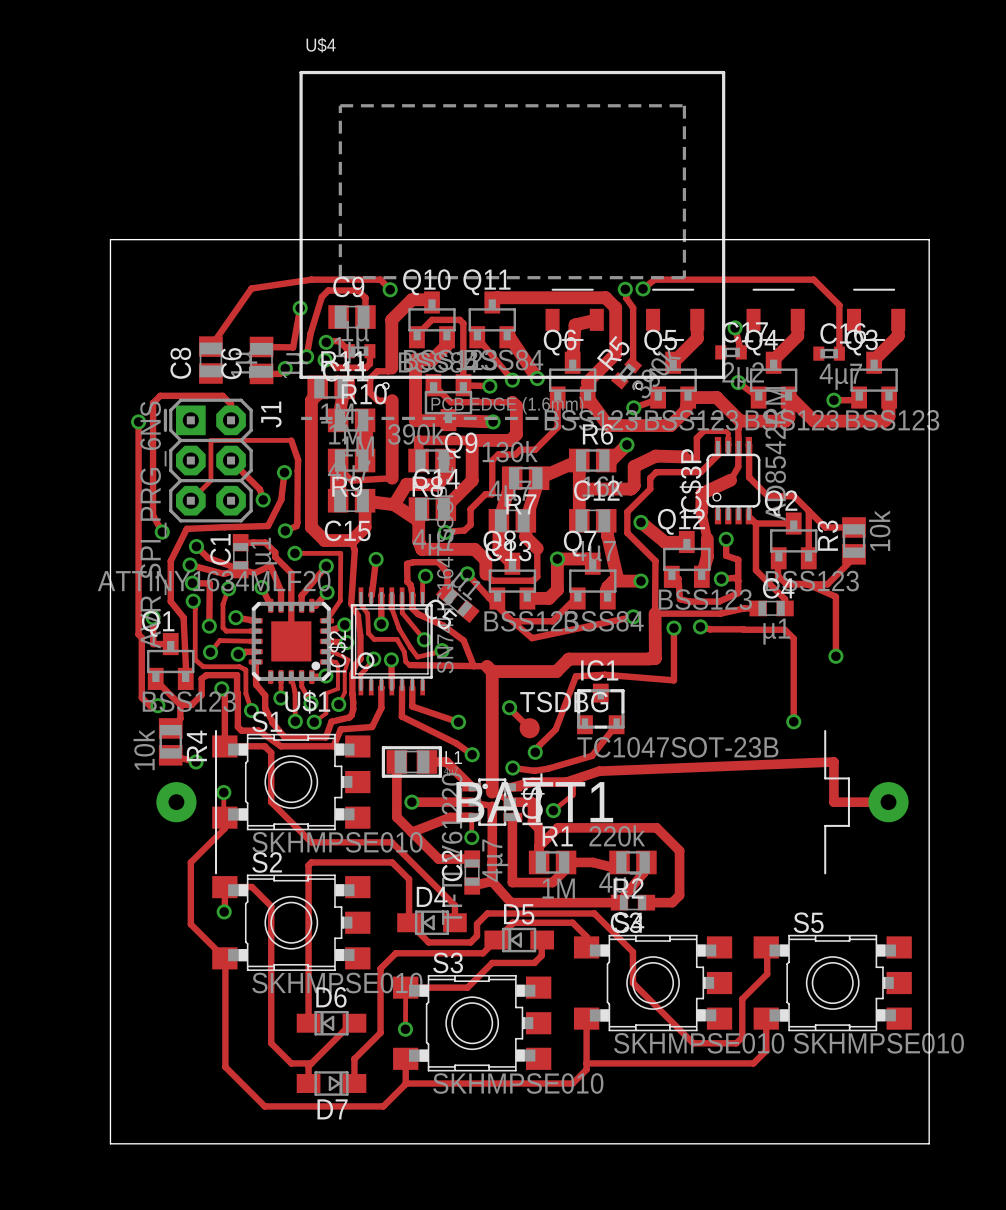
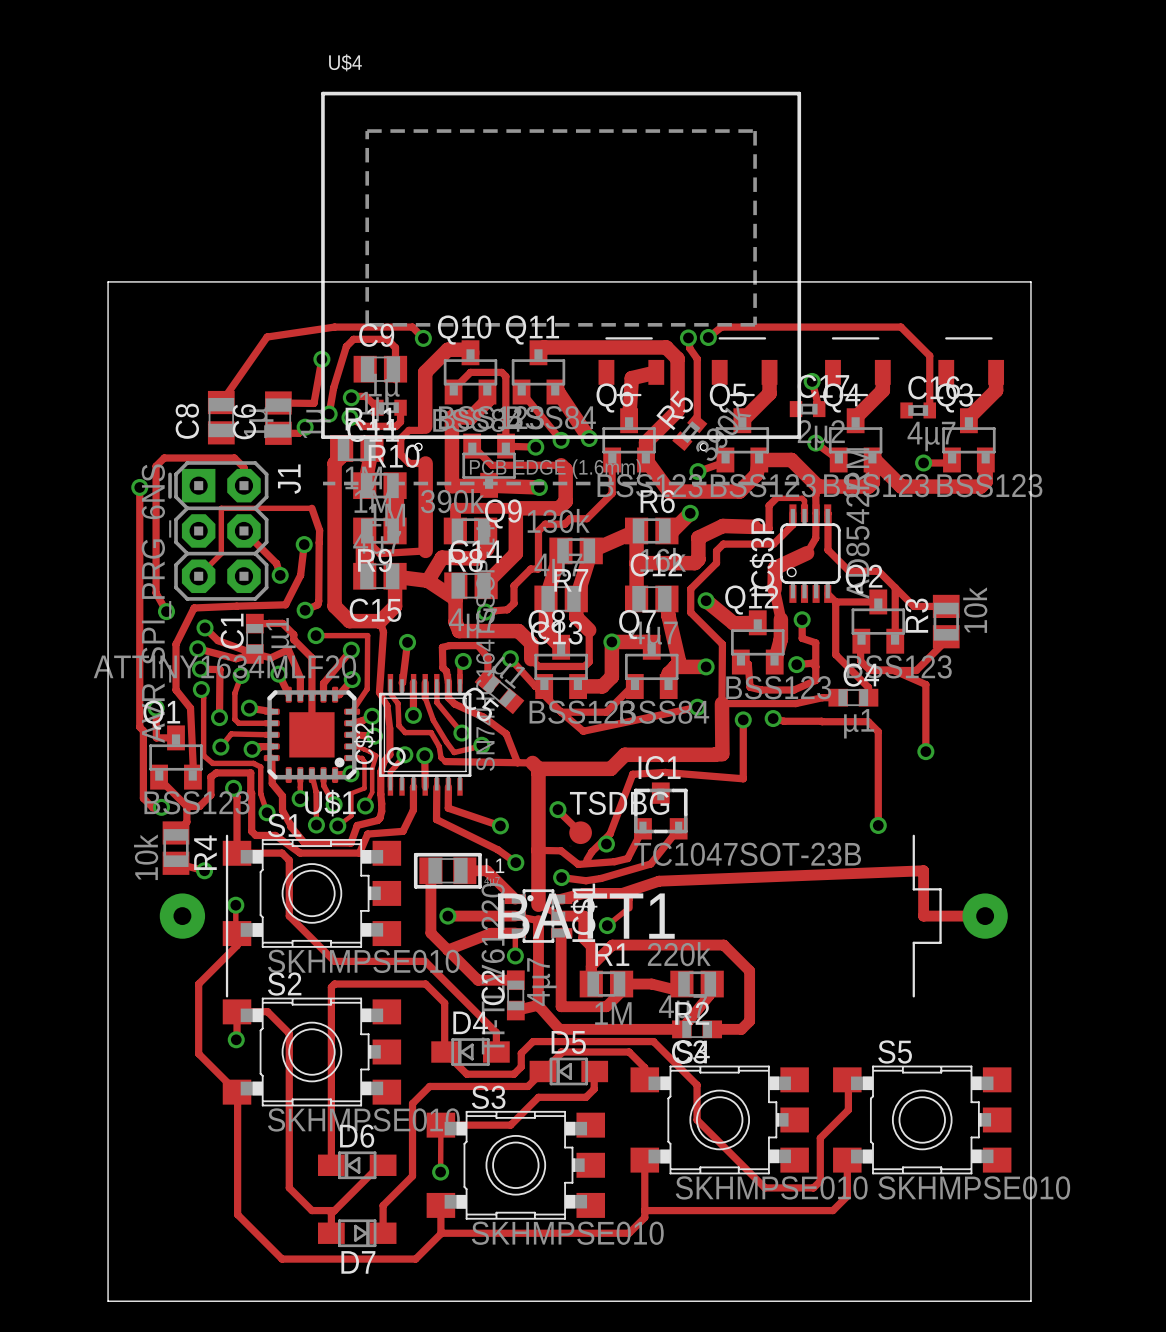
track: none -> (642, 828) (627, 858) (614, 861) (578, 864) (561, 850) (538, 850)
via position: (535, 752) -> (606, 844)

